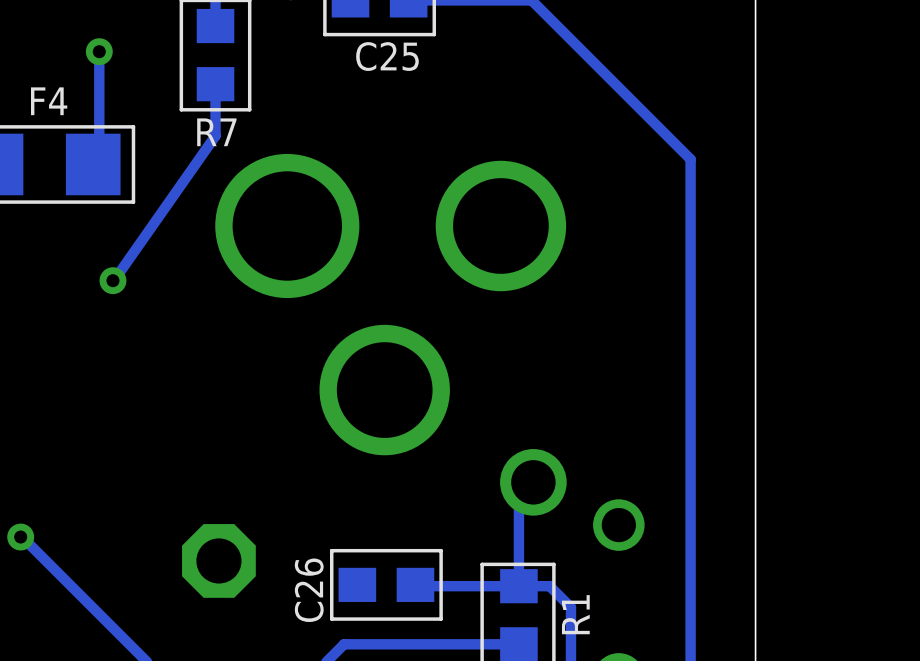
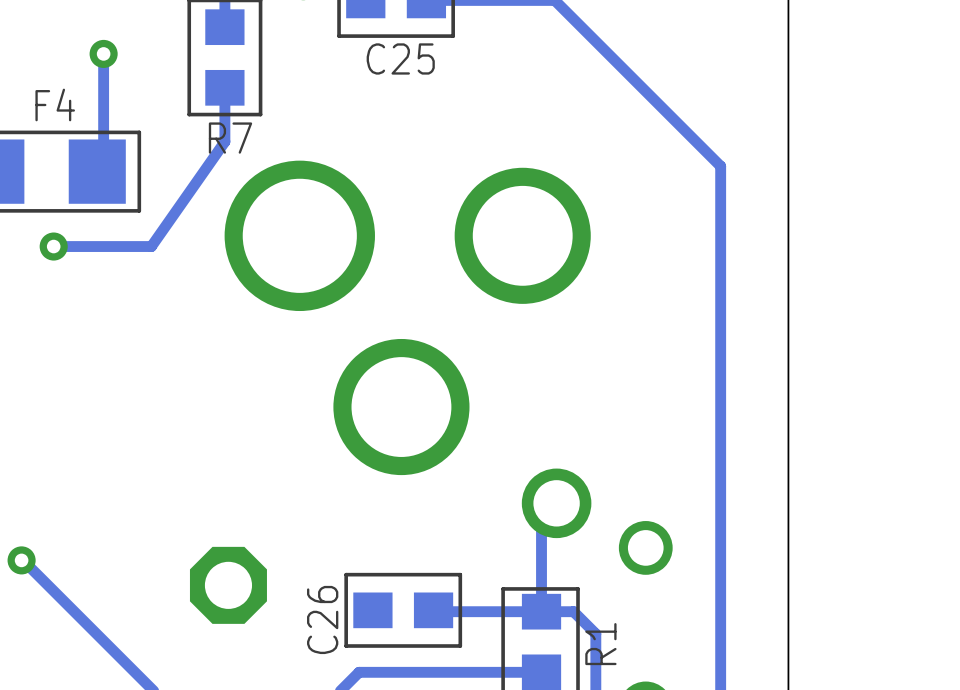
track: (145, 236) (112, 280) -> (151, 246) (53, 246)
via position: (112, 280) -> (53, 246)

